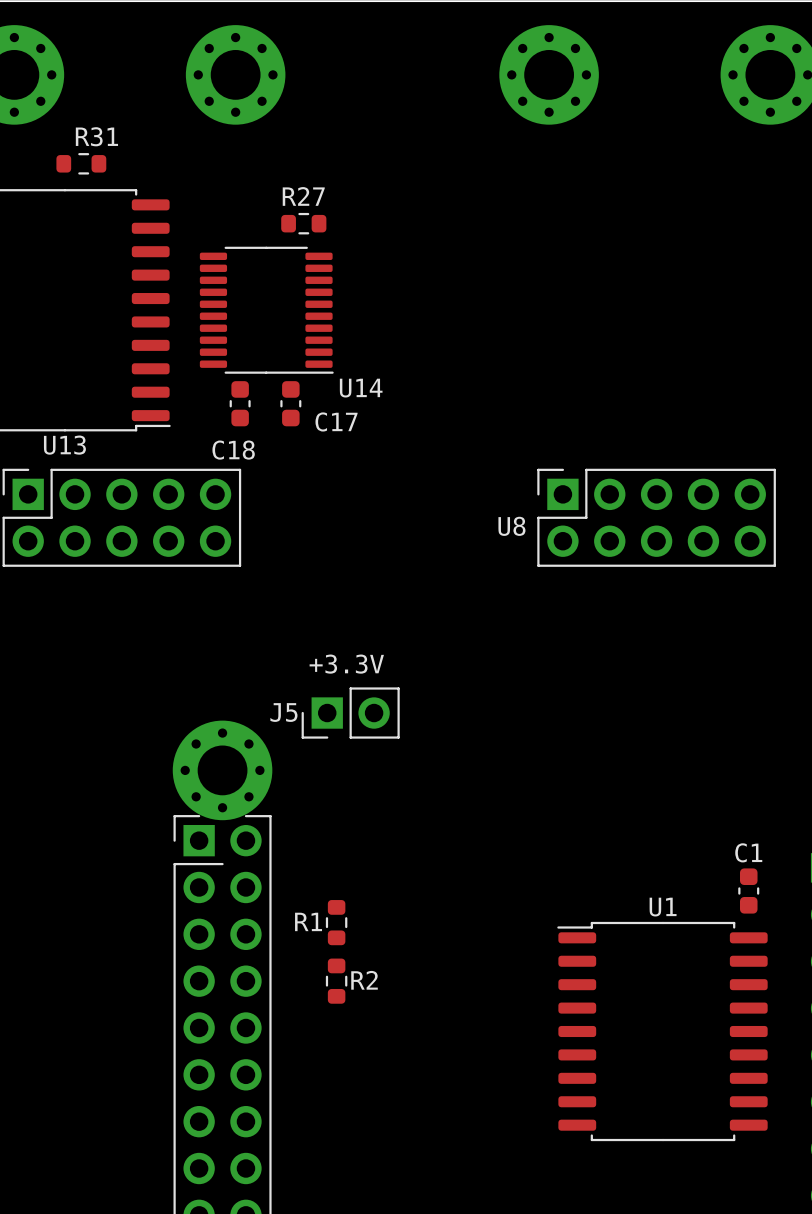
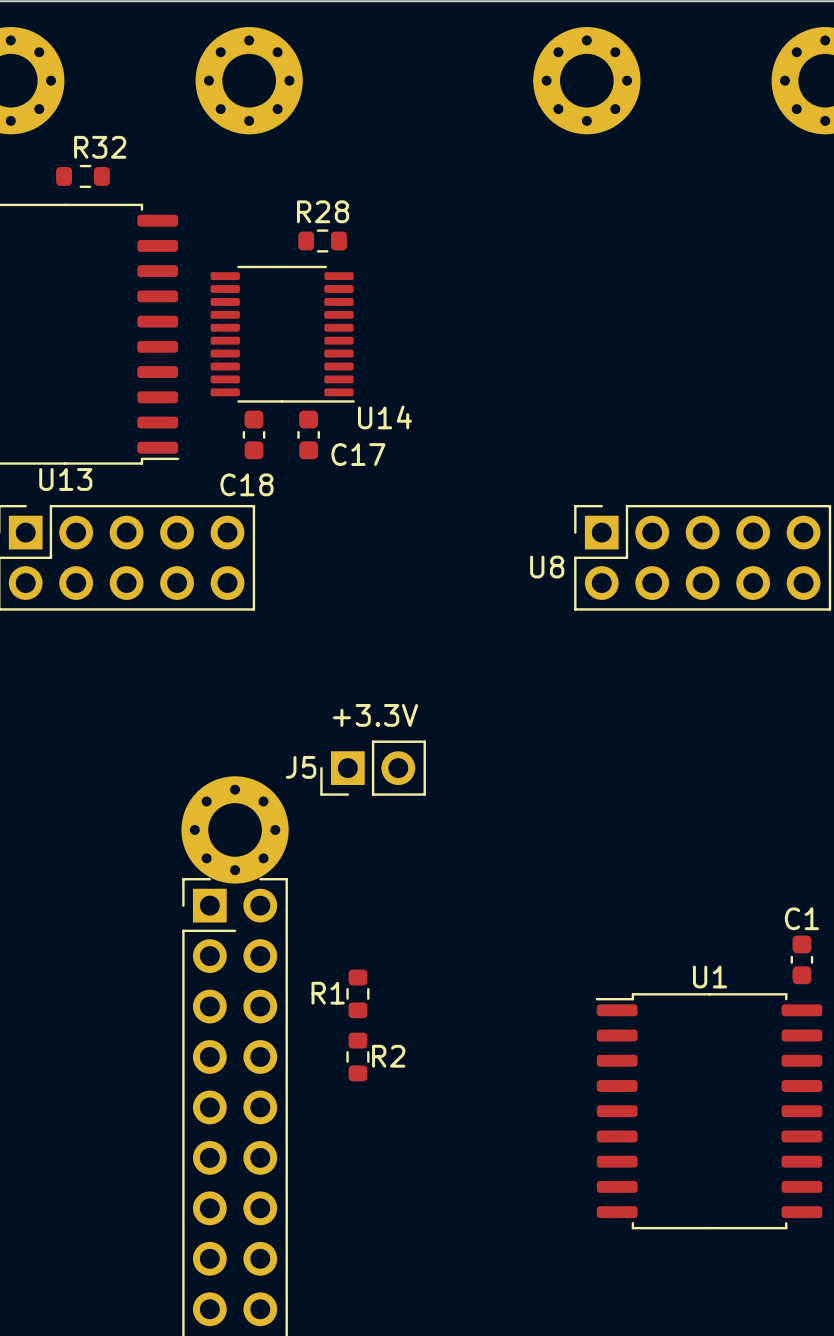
R31 name: R31 (96, 136) -> R32 (100, 147)
R27 name: R27 (303, 196) -> R28 (323, 211)

